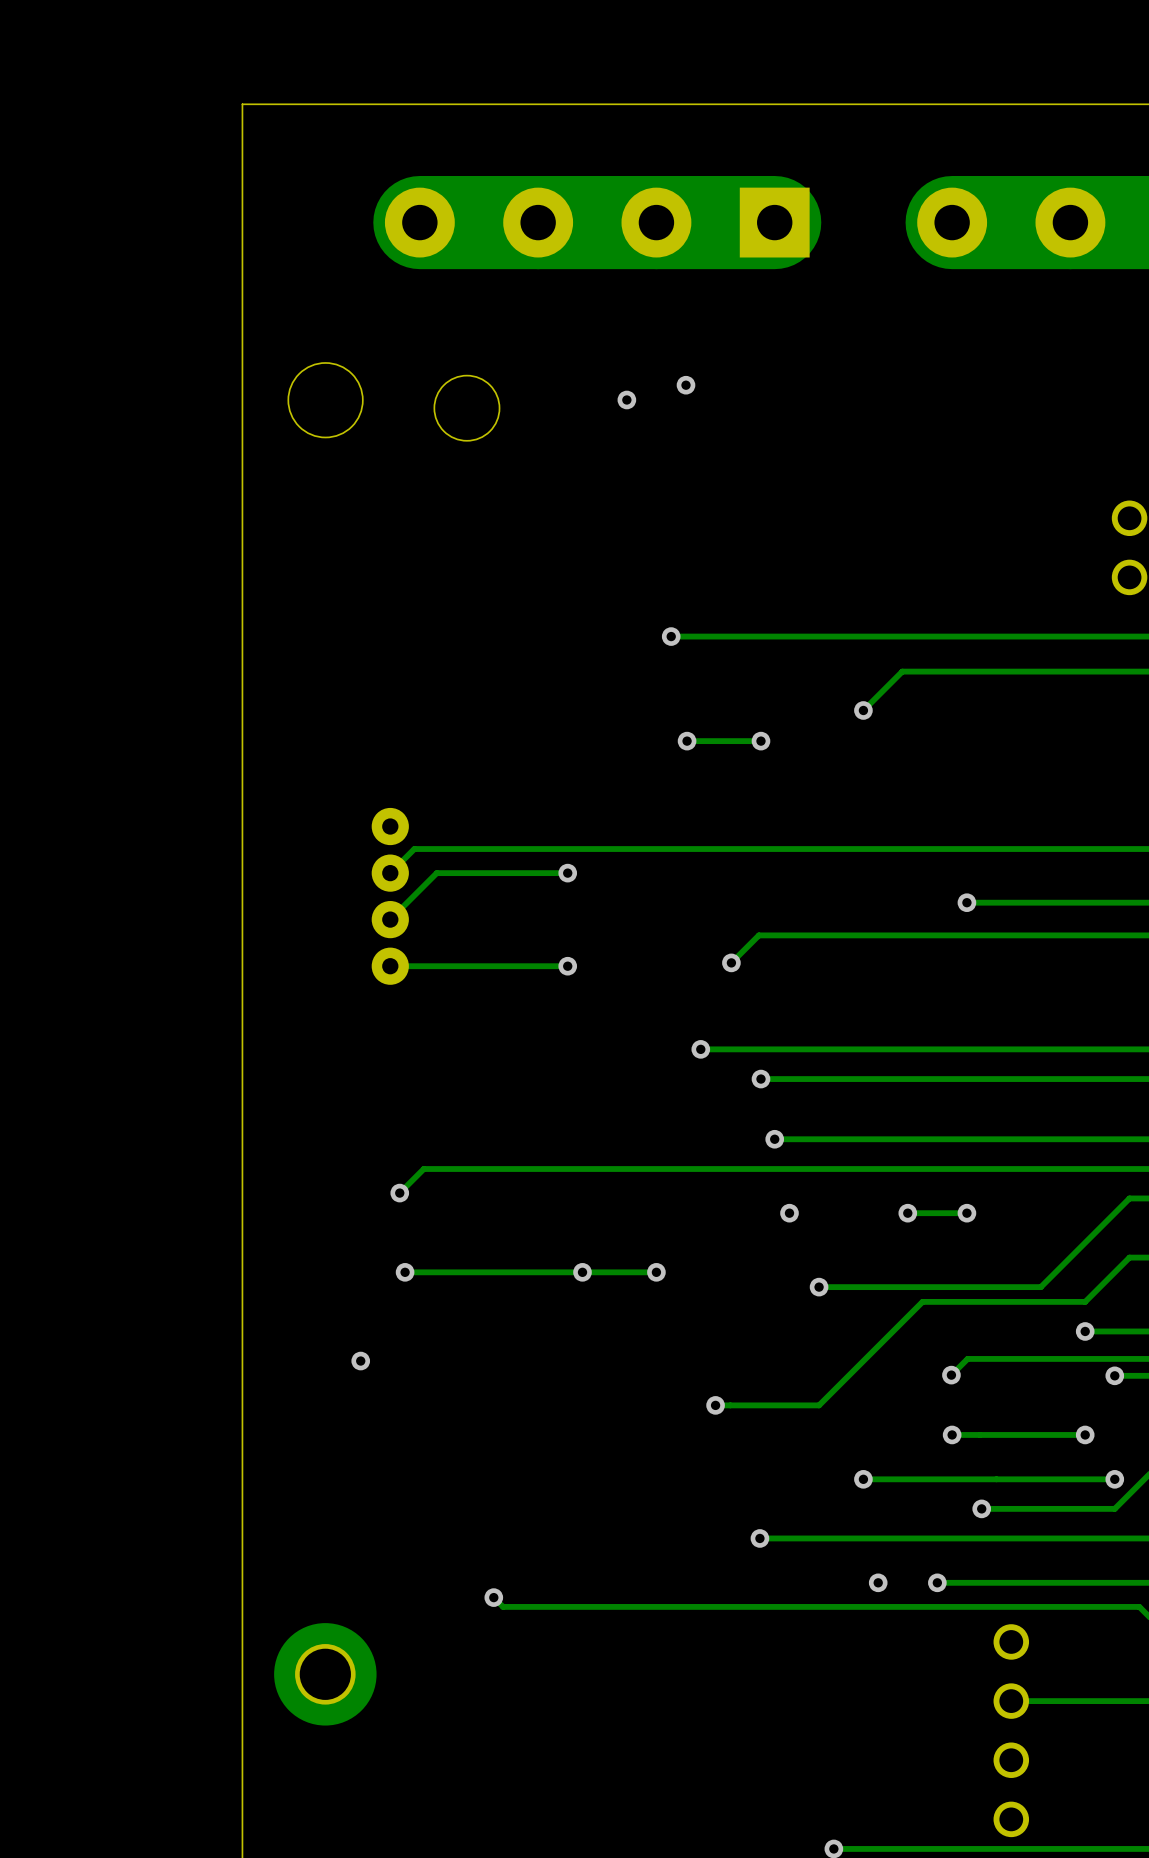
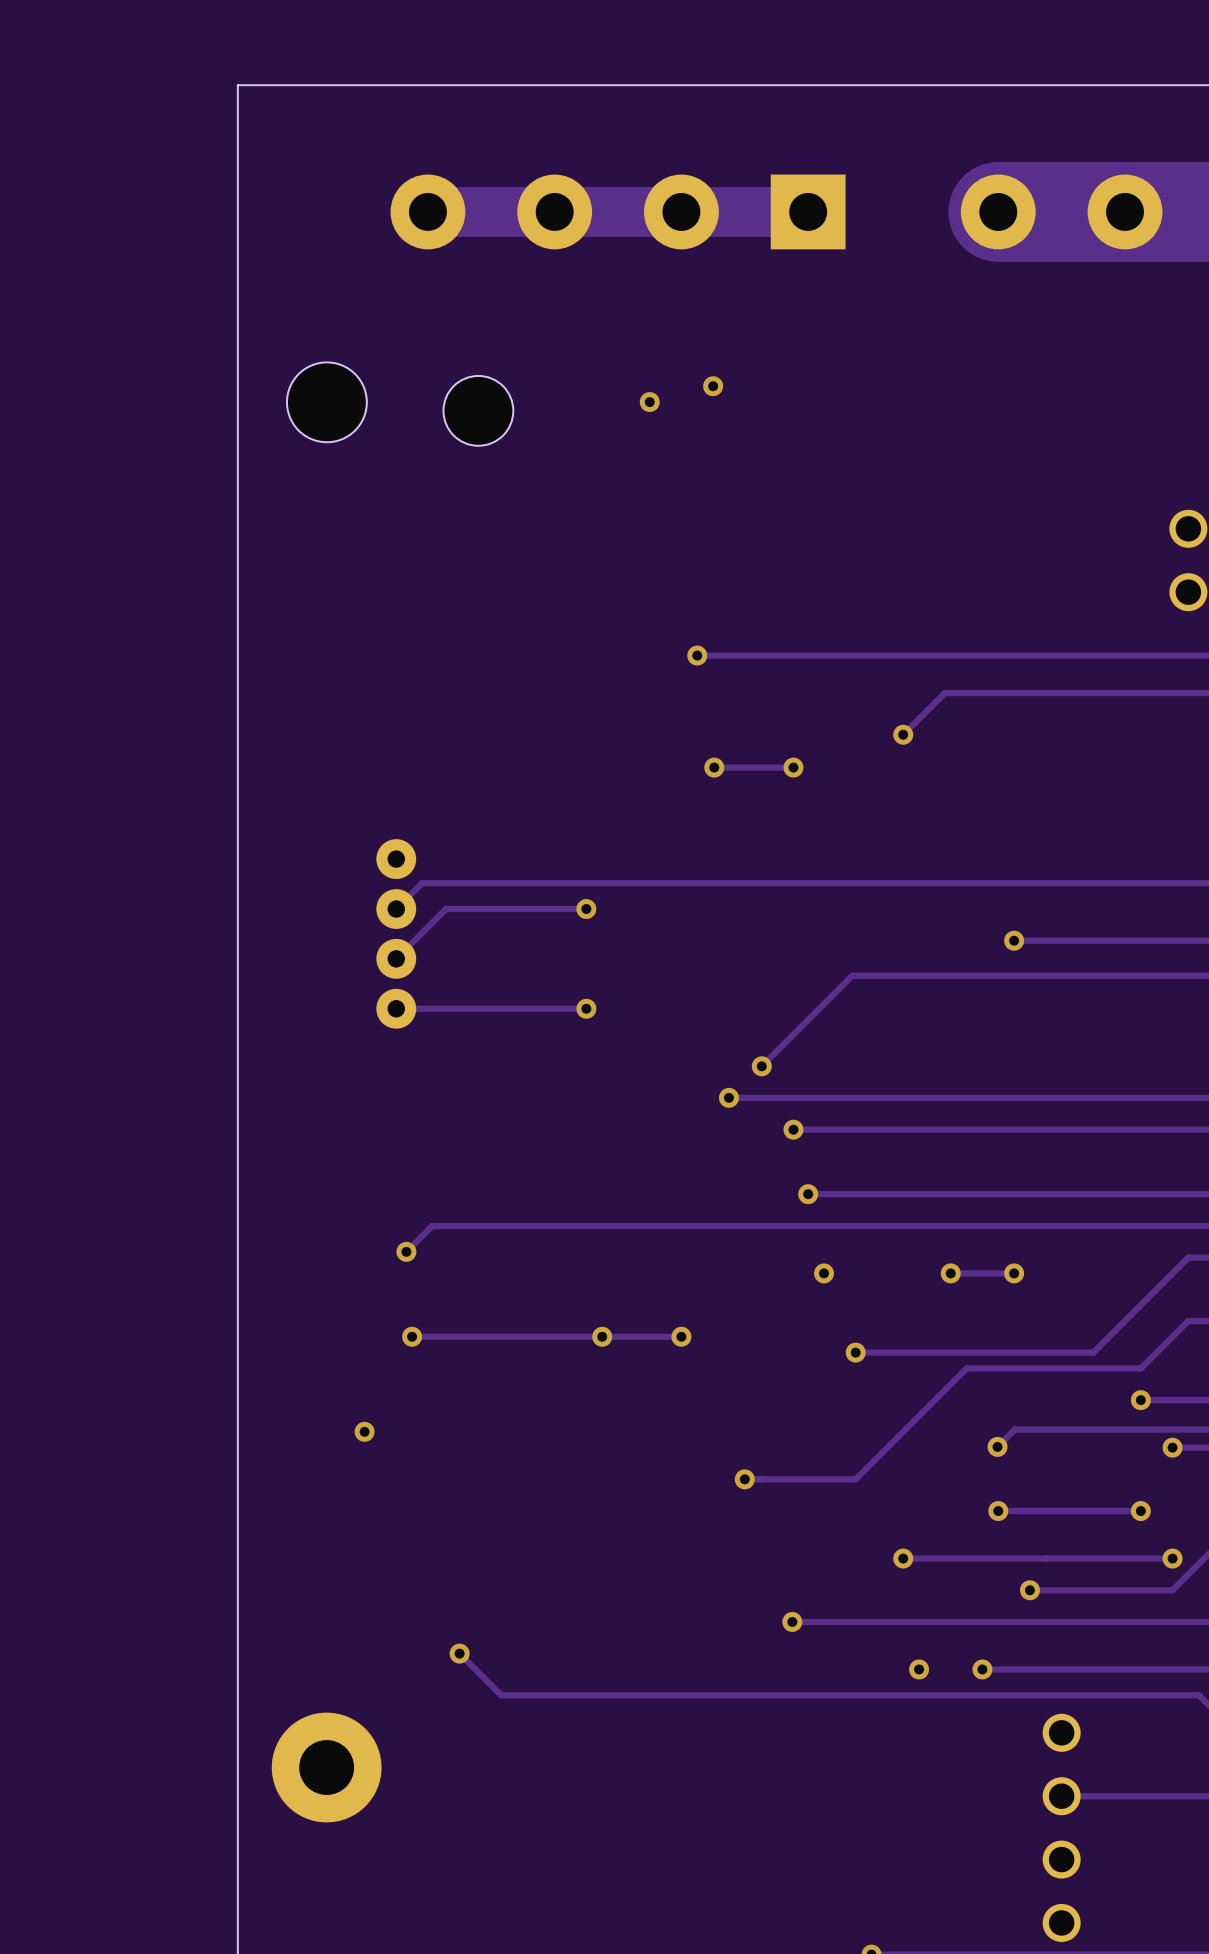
track width: thick (774, 222) (419, 222) -> thin (808, 211) (427, 211)
track: (815, 935) (758, 935) (731, 962) -> (852, 975) (761, 1066)
via position: (731, 962) -> (761, 1066)
track: (493, 1597) (503, 1606) (1139, 1606) -> (459, 1653) (501, 1695) (1198, 1695)
via position: (493, 1597) -> (459, 1653)

